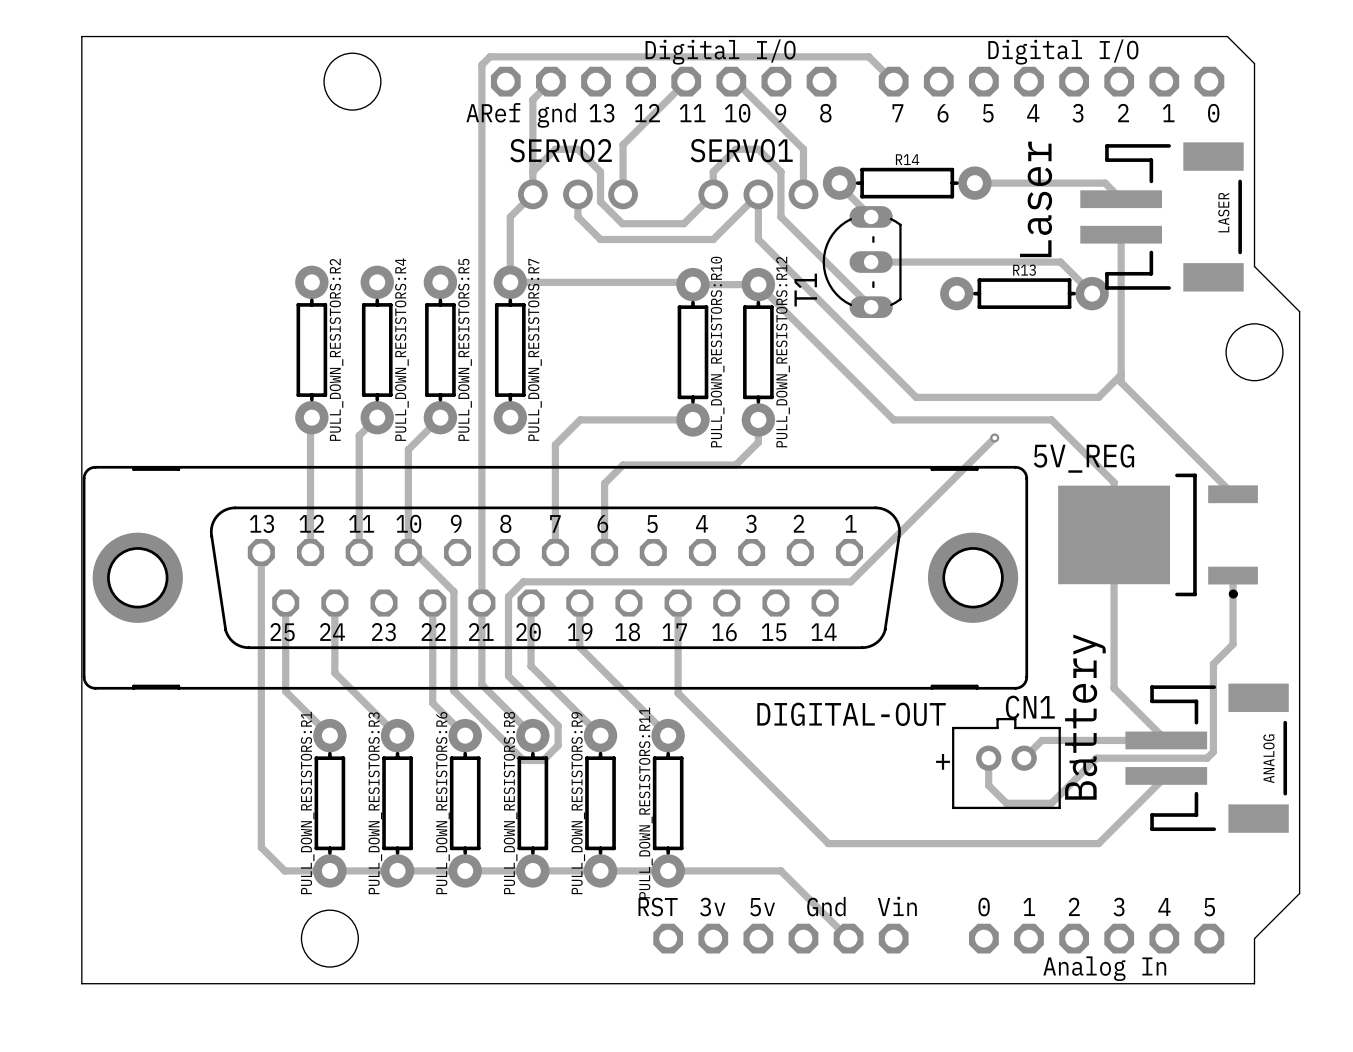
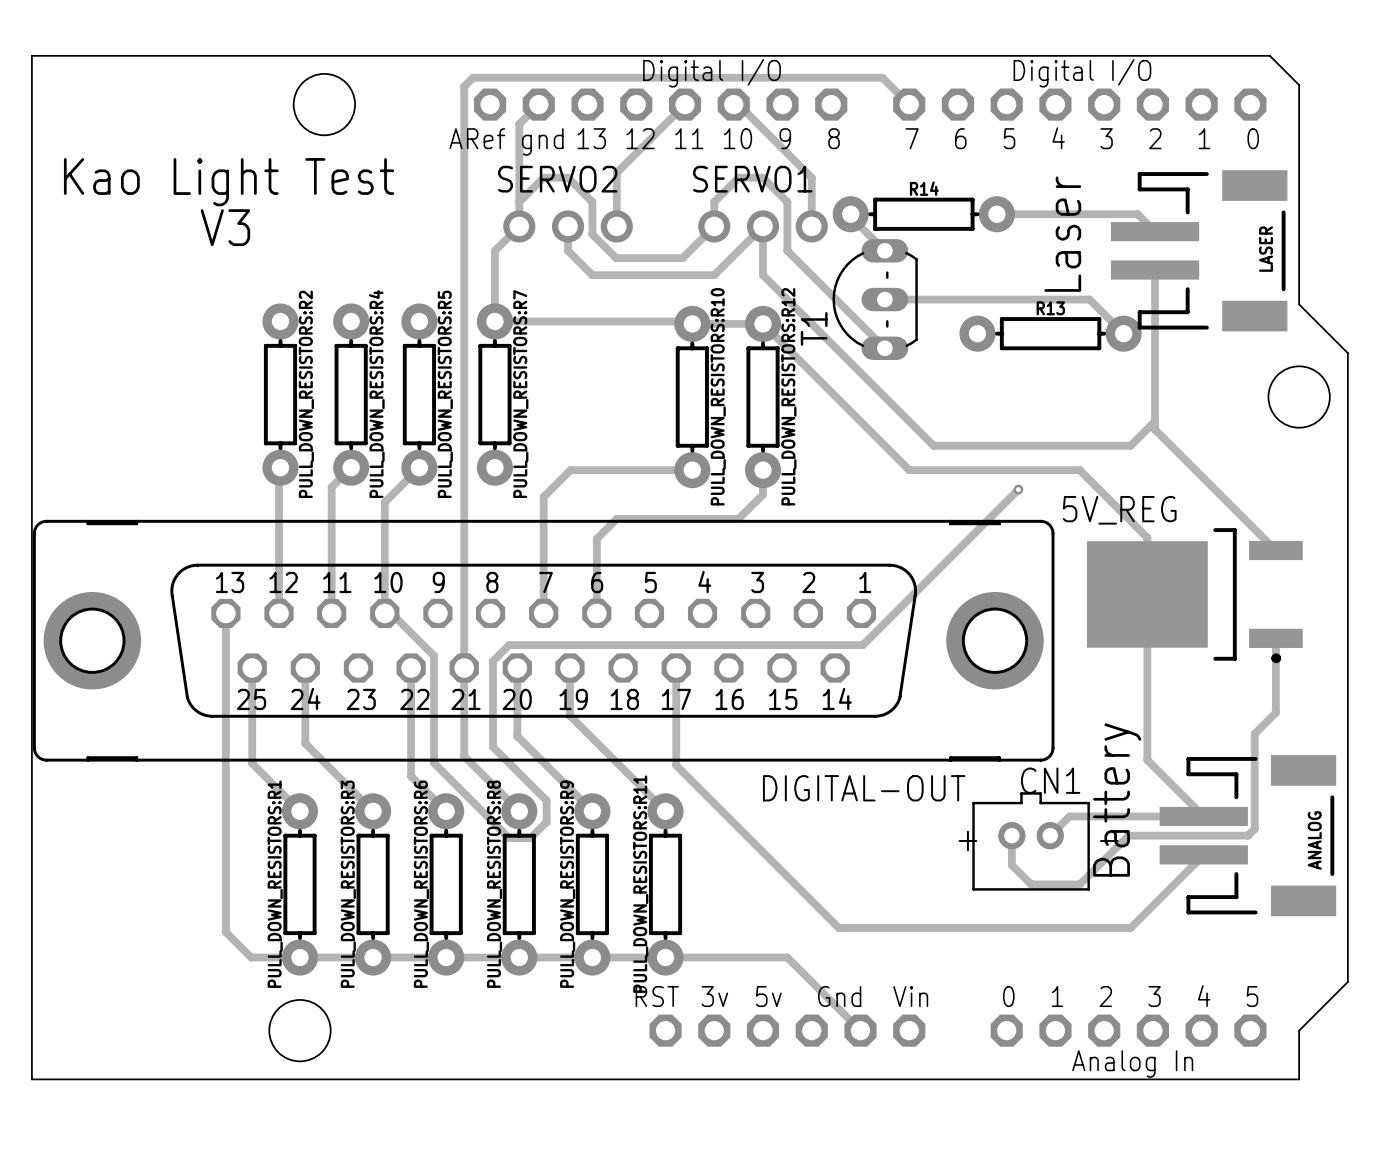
text: none -> Kao Light Test (229, 182)
text: none -> V3 (225, 227)

